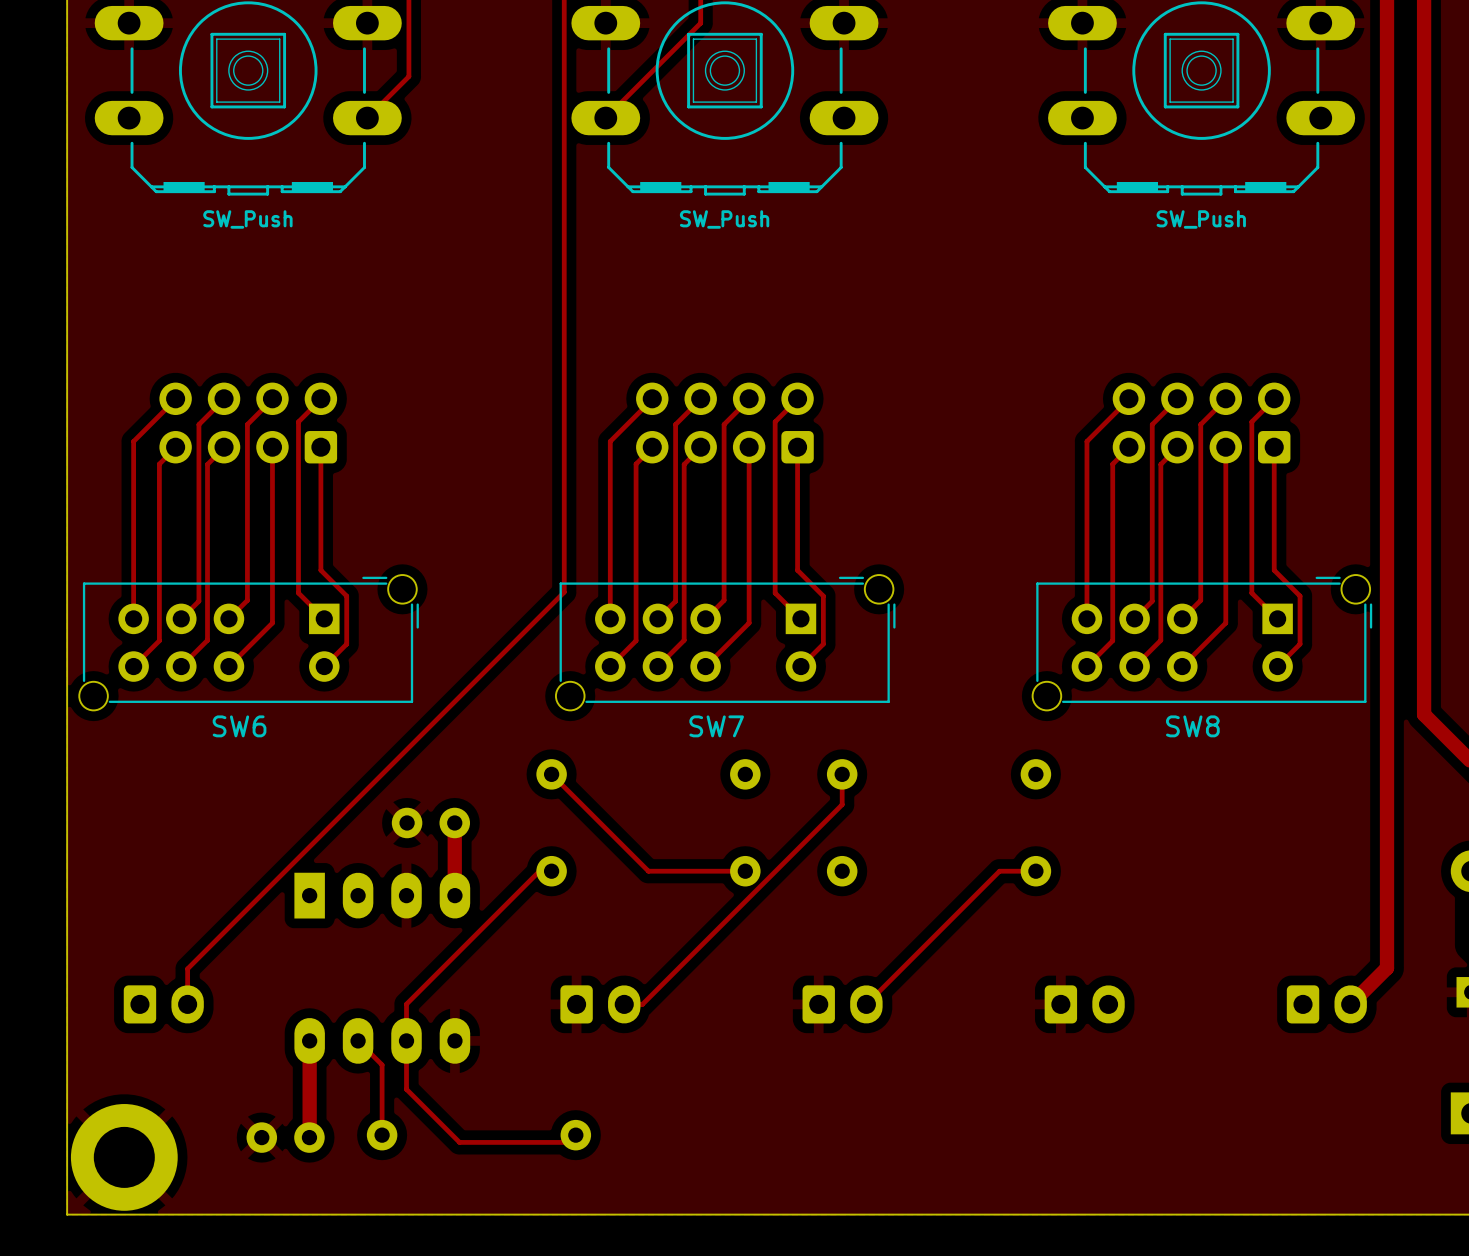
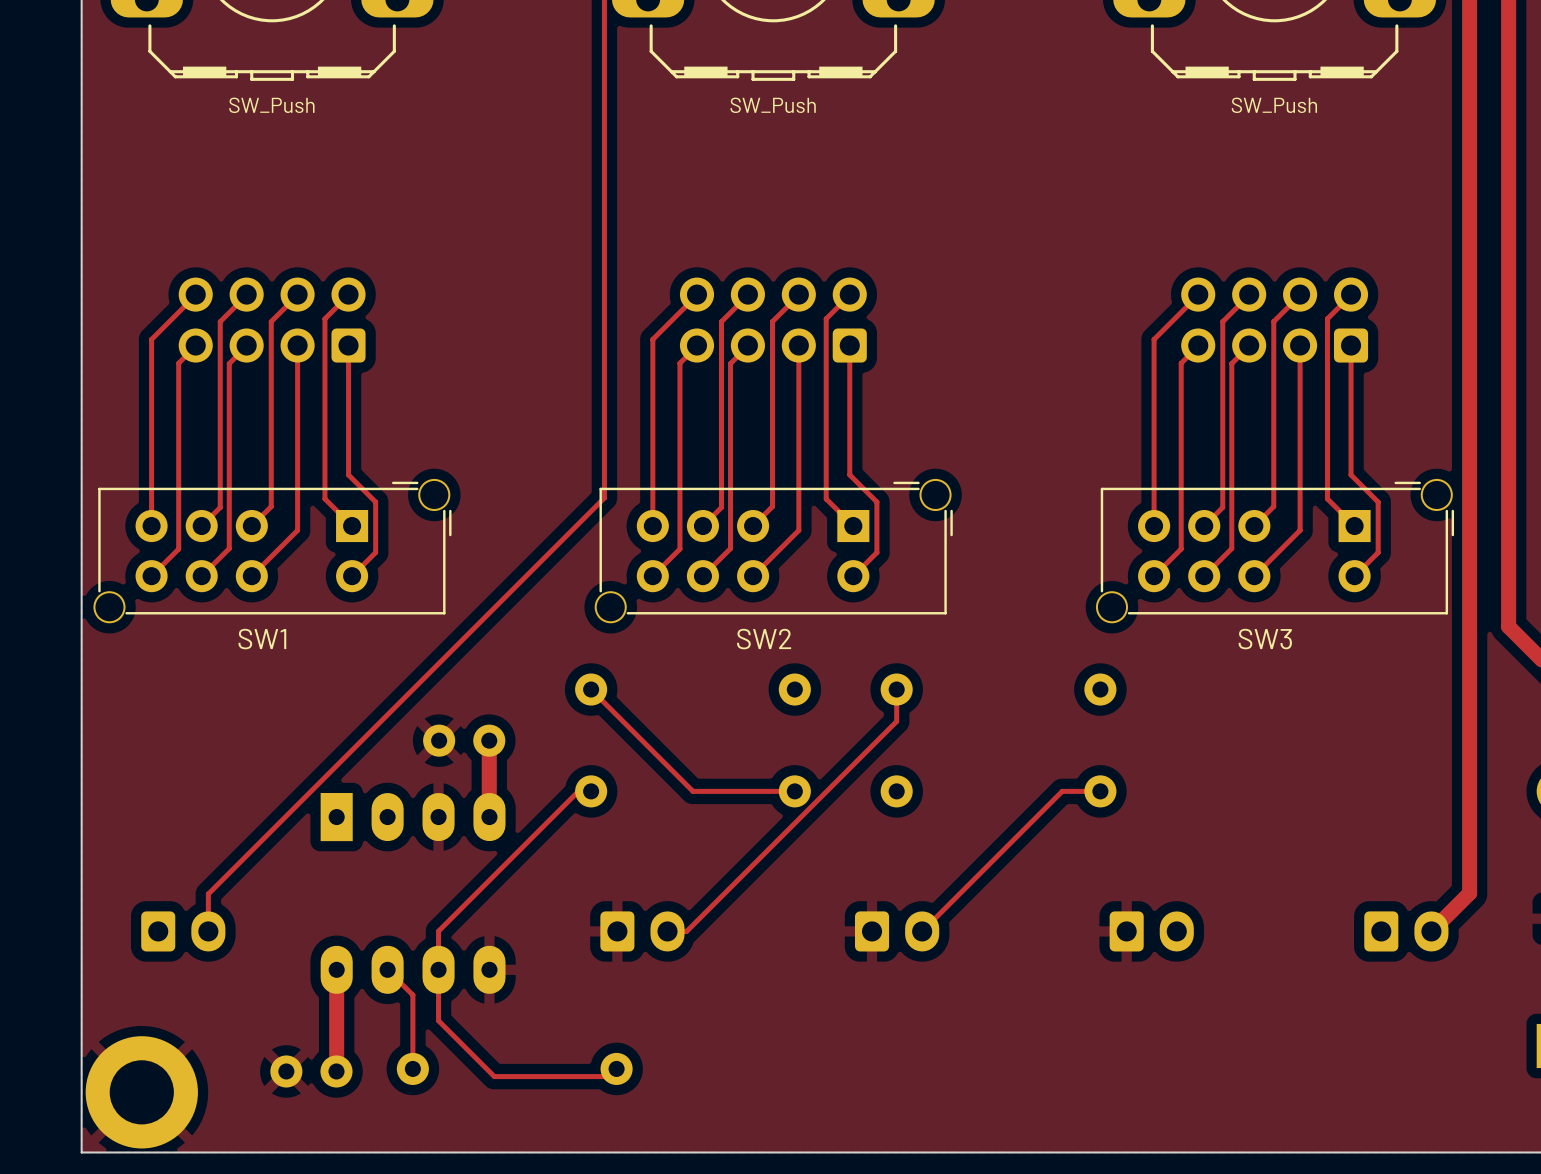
SW6 name: SW6 (239, 726) -> SW1 (262, 639)
SW7 name: SW7 (716, 726) -> SW2 (764, 639)
SW8 name: SW8 (1192, 726) -> SW3 (1265, 639)

